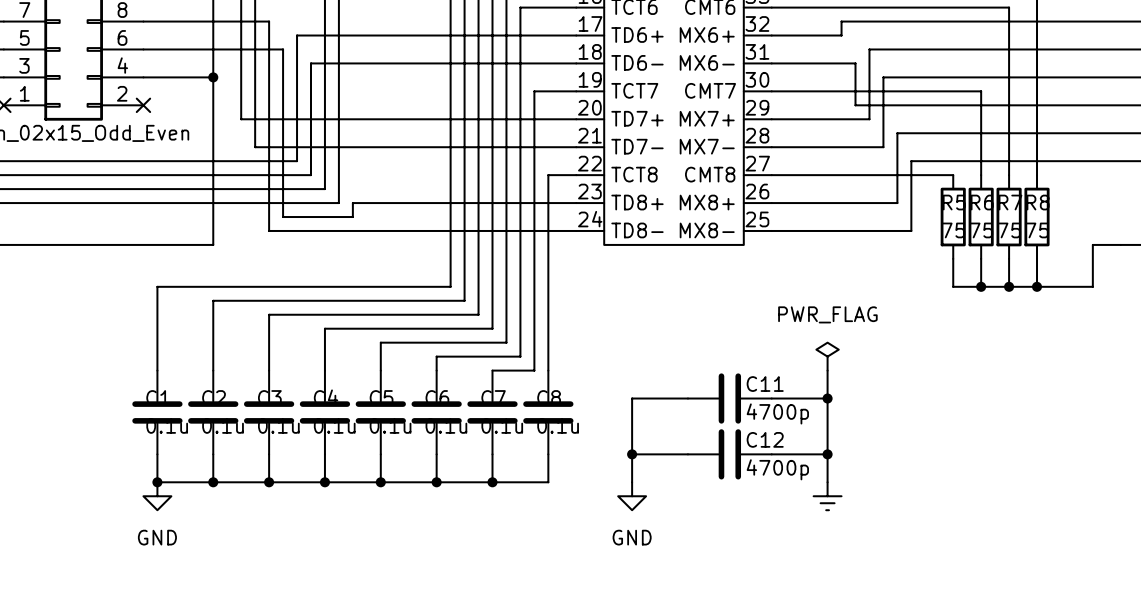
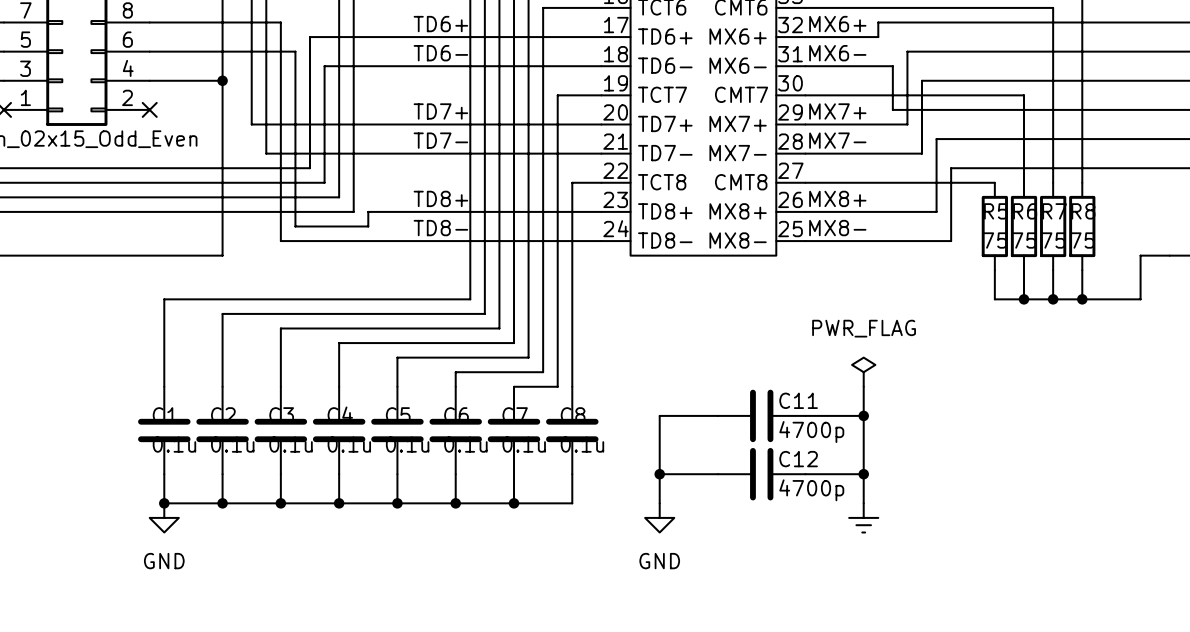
label: none -> TD6+ (440, 24)
label: none -> MX6+ (837, 24)
label: none -> TD6- (440, 53)
label: none -> MX6- (837, 53)
label: none -> TD7+ (440, 111)
label: none -> MX7+ (837, 111)
label: none -> TD7- (440, 140)
label: none -> MX7- (837, 140)
label: none -> TD8+ (440, 198)
label: none -> MX8+ (837, 198)
label: none -> TD8- (440, 228)
label: none -> MX8- (837, 228)

